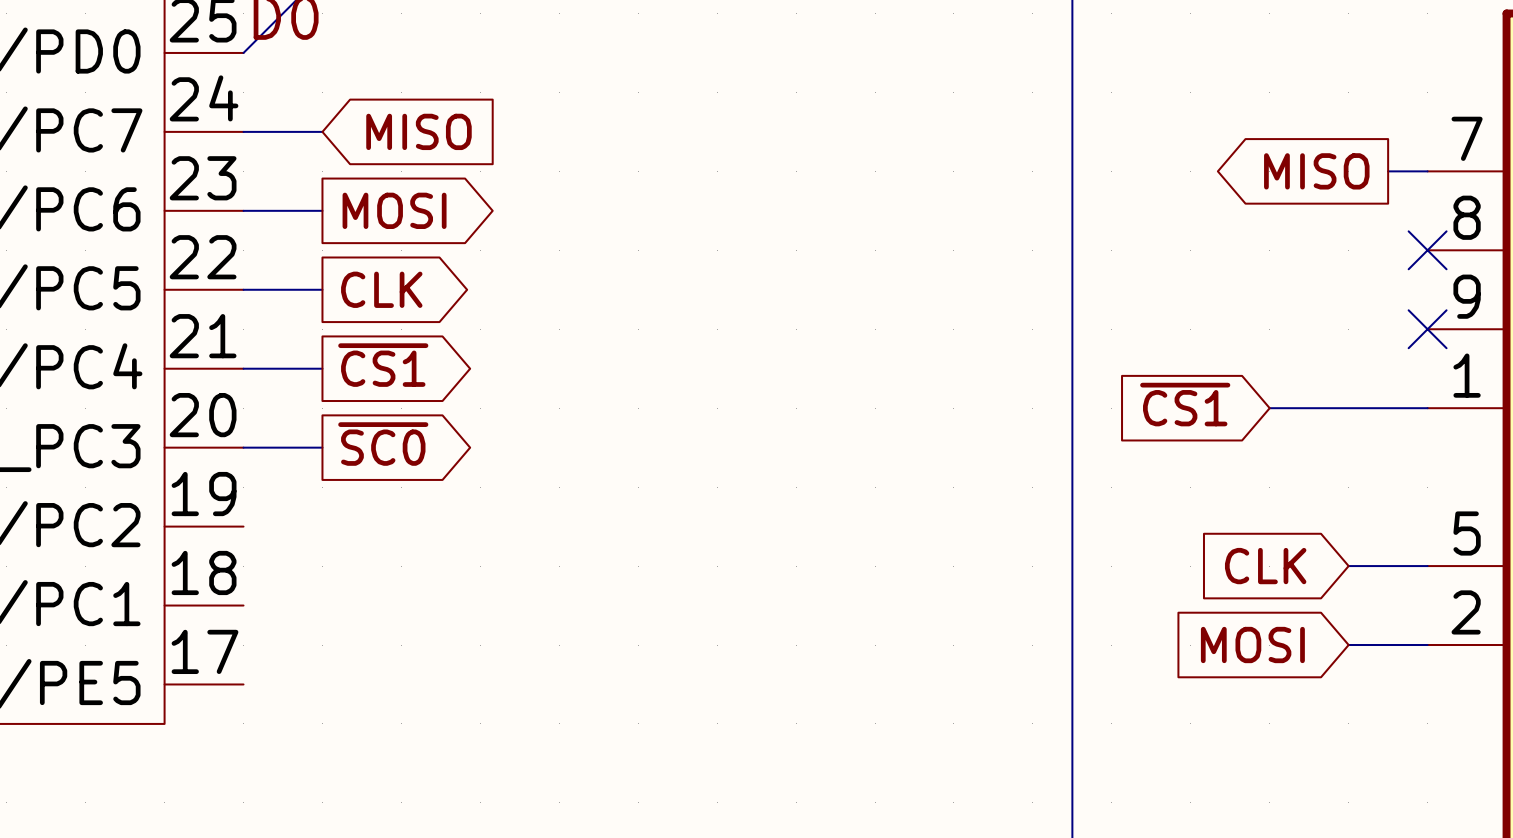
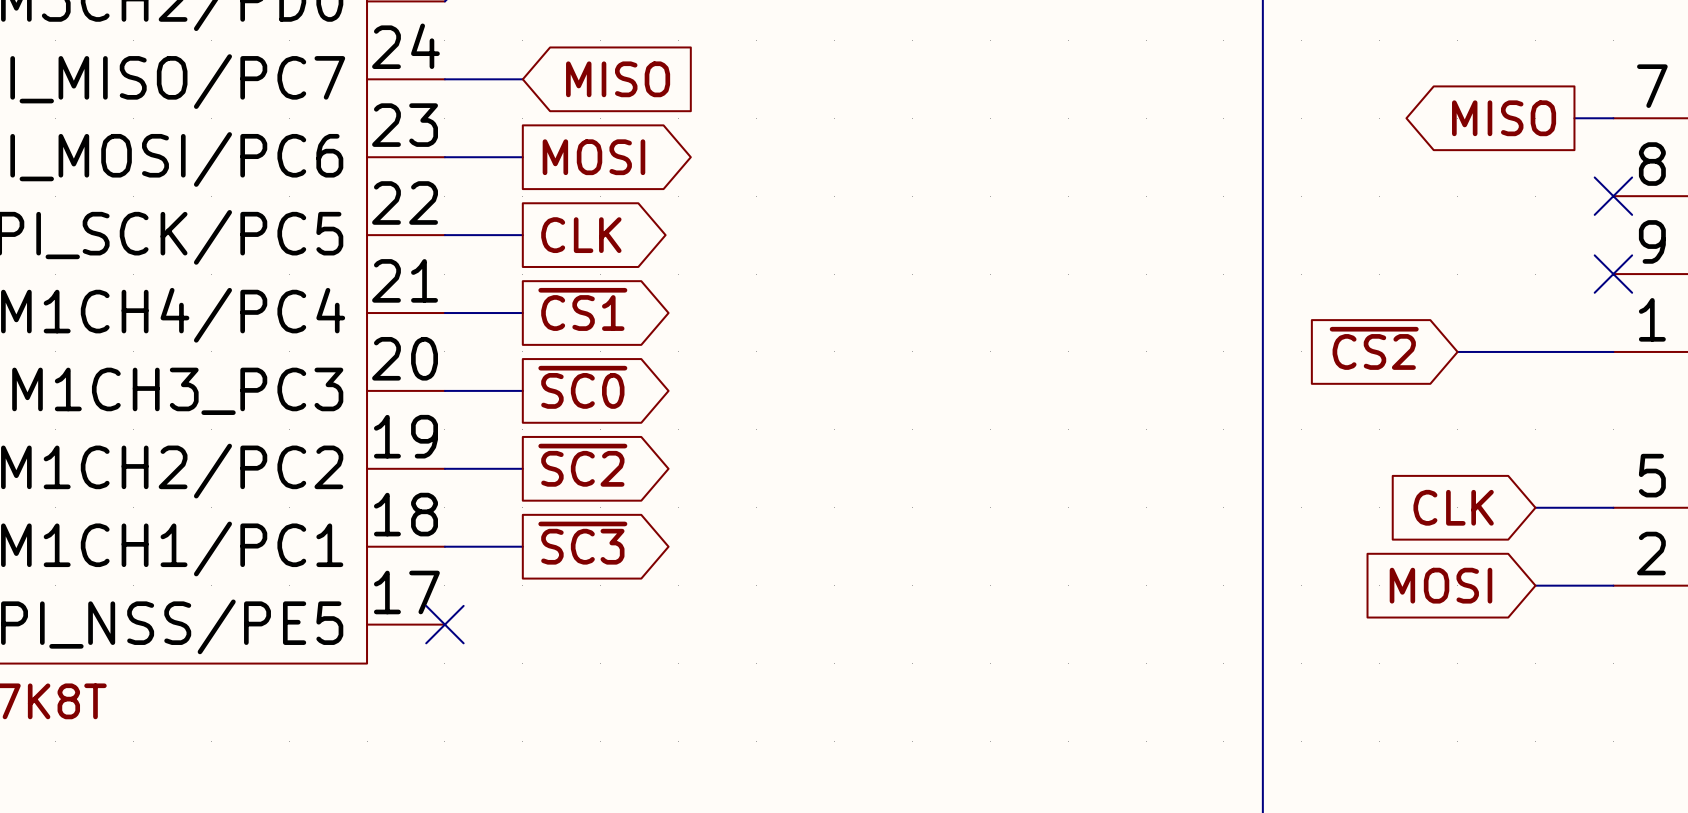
global label: ~{CS1} (1185, 404) -> ~{CS2} (1374, 348)
global label: none -> ~{SC2} (582, 465)
wire: none -> (444, 468) (522, 468)
global label: none -> ~{SC3} (582, 543)
wire: none -> (444, 546) (522, 546)
no-connect mark: none -> (444, 624)

